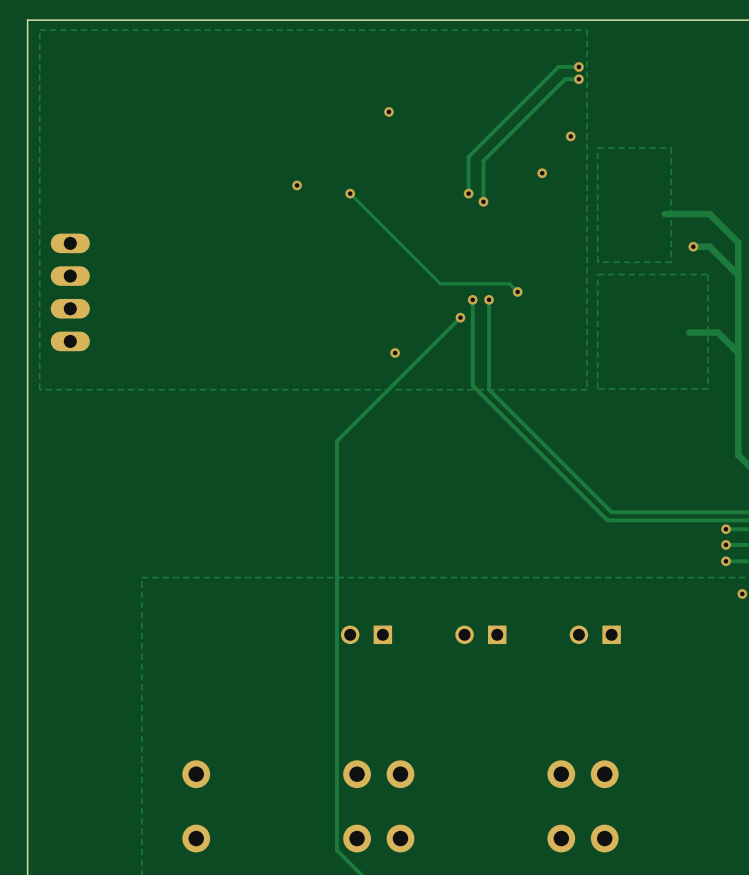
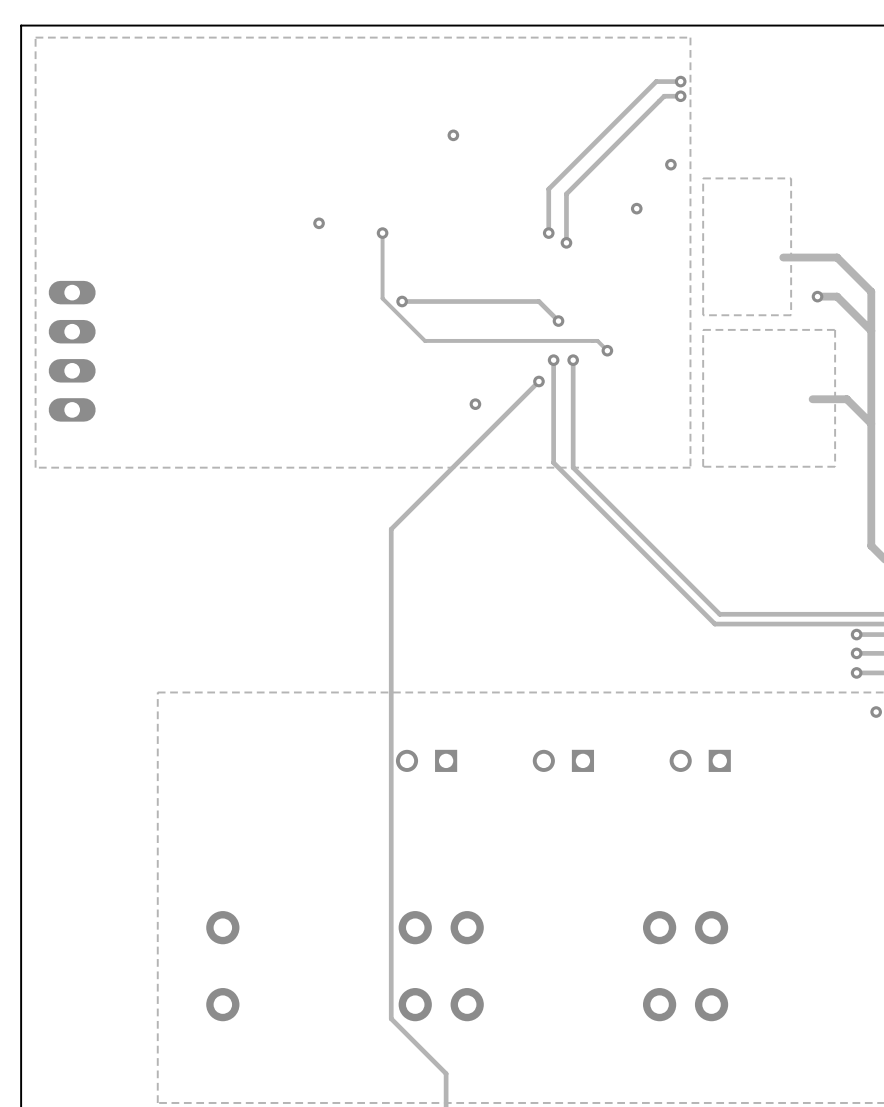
via: none -> (319, 223)
via: (297, 185) -> none
via: none -> (382, 233)
track: (350, 193) (440, 283) -> (382, 233) (382, 298) (425, 340) (514, 340)
via: (350, 193) -> none
track: none -> (402, 301) (538, 301) (558, 321)
via: none -> (402, 301)
via: none -> (558, 321)
via position: (395, 352) -> (475, 404)

